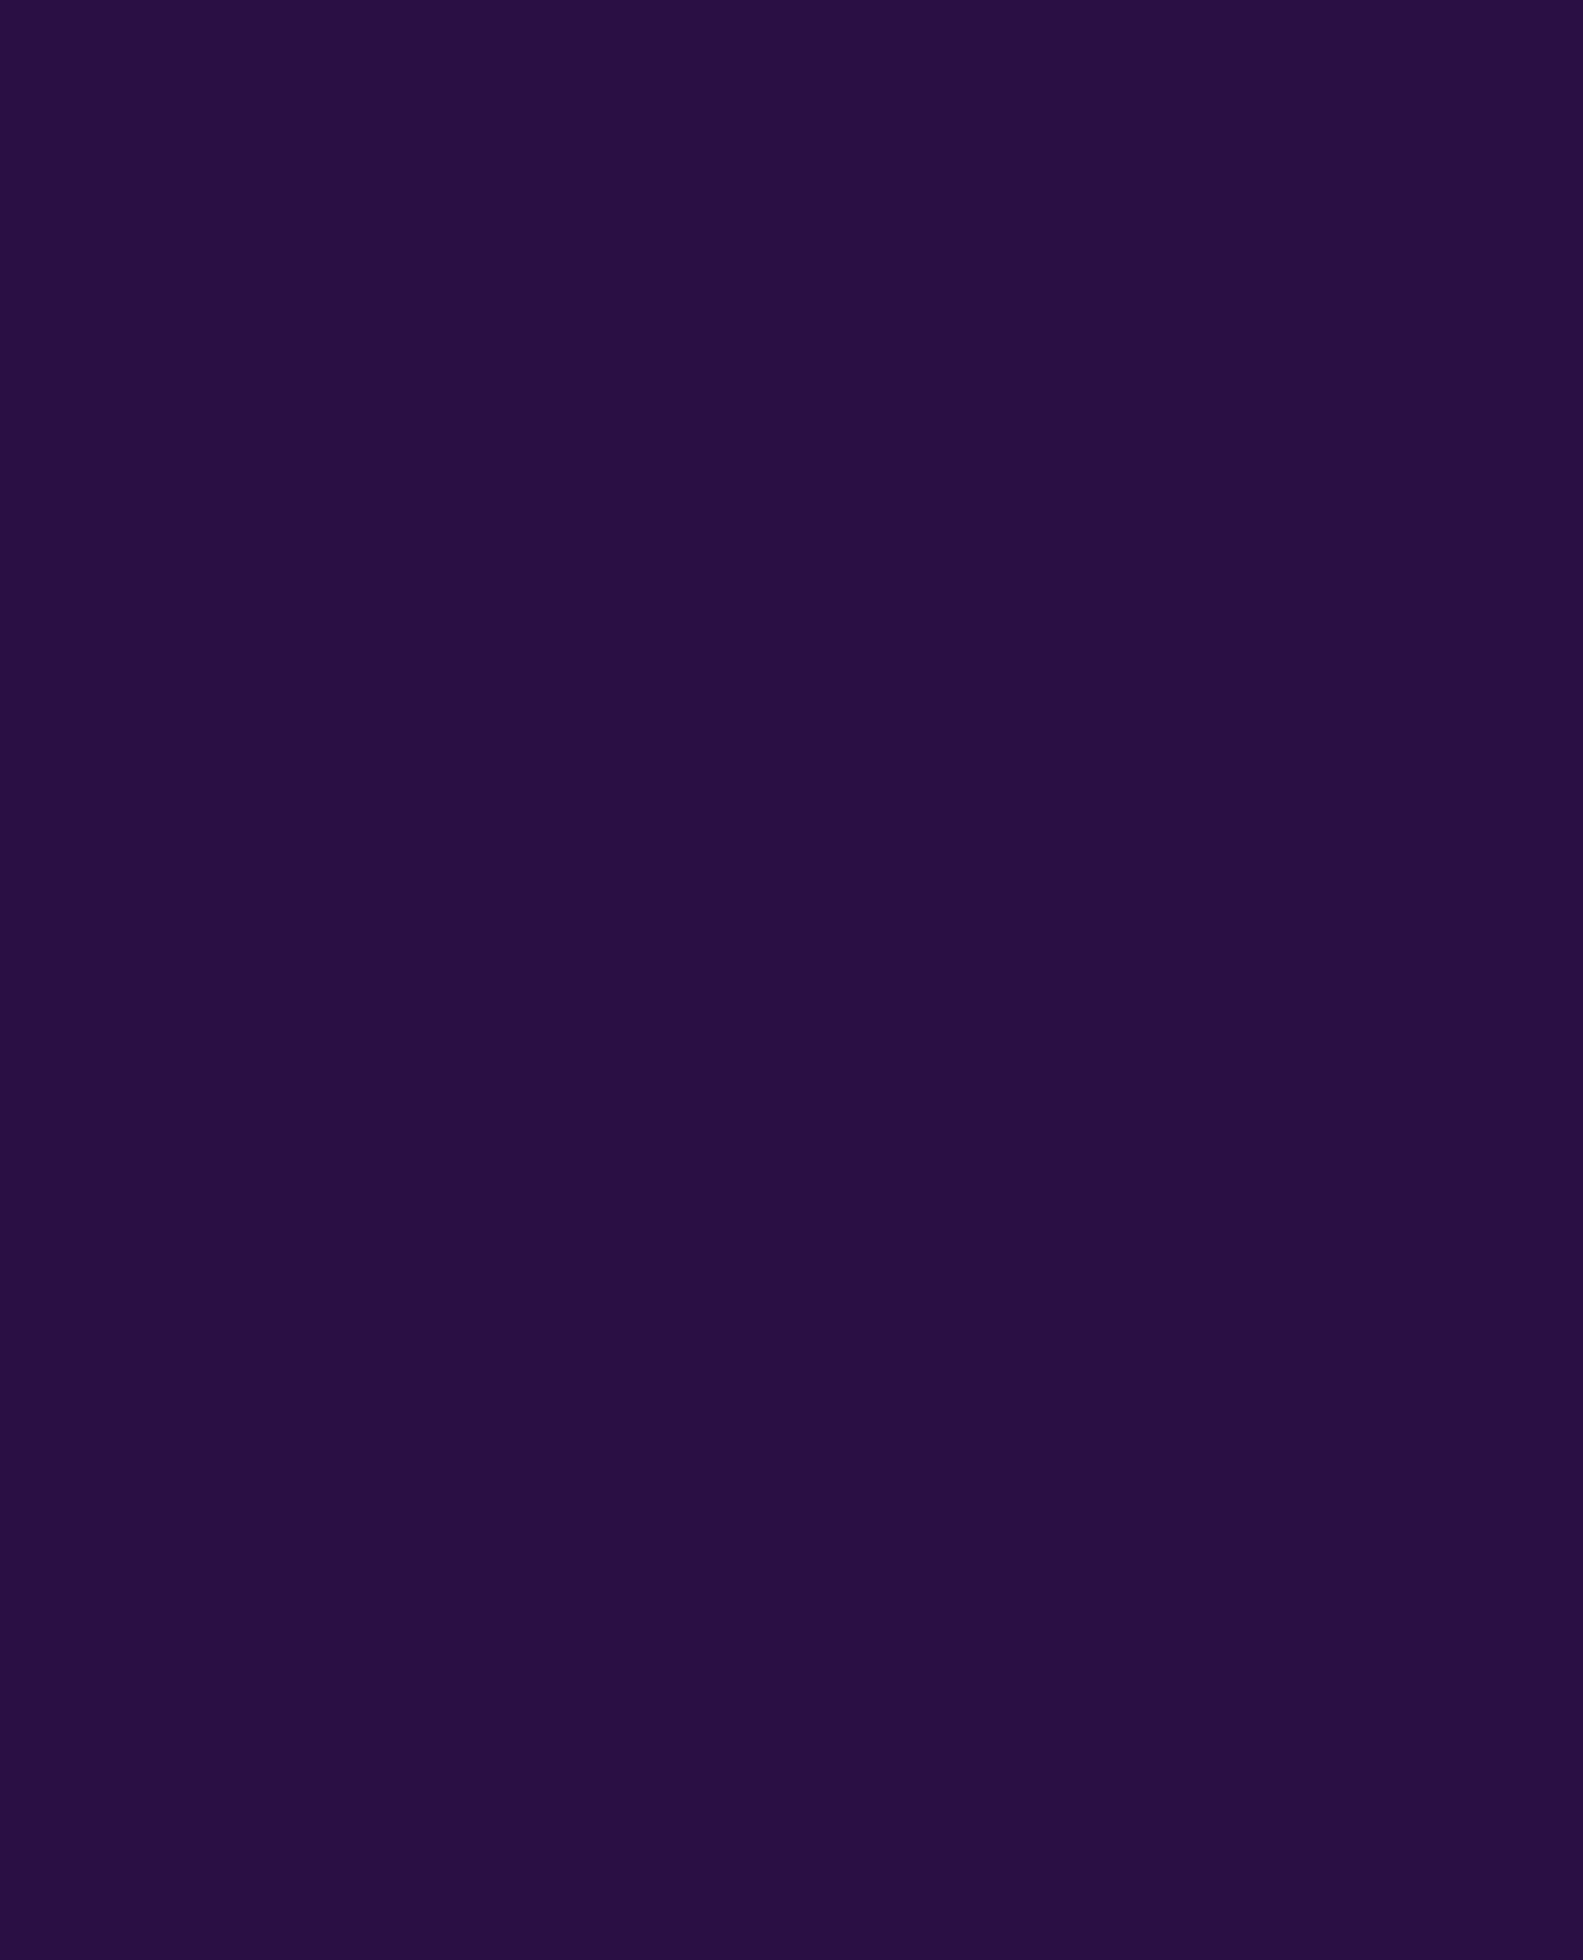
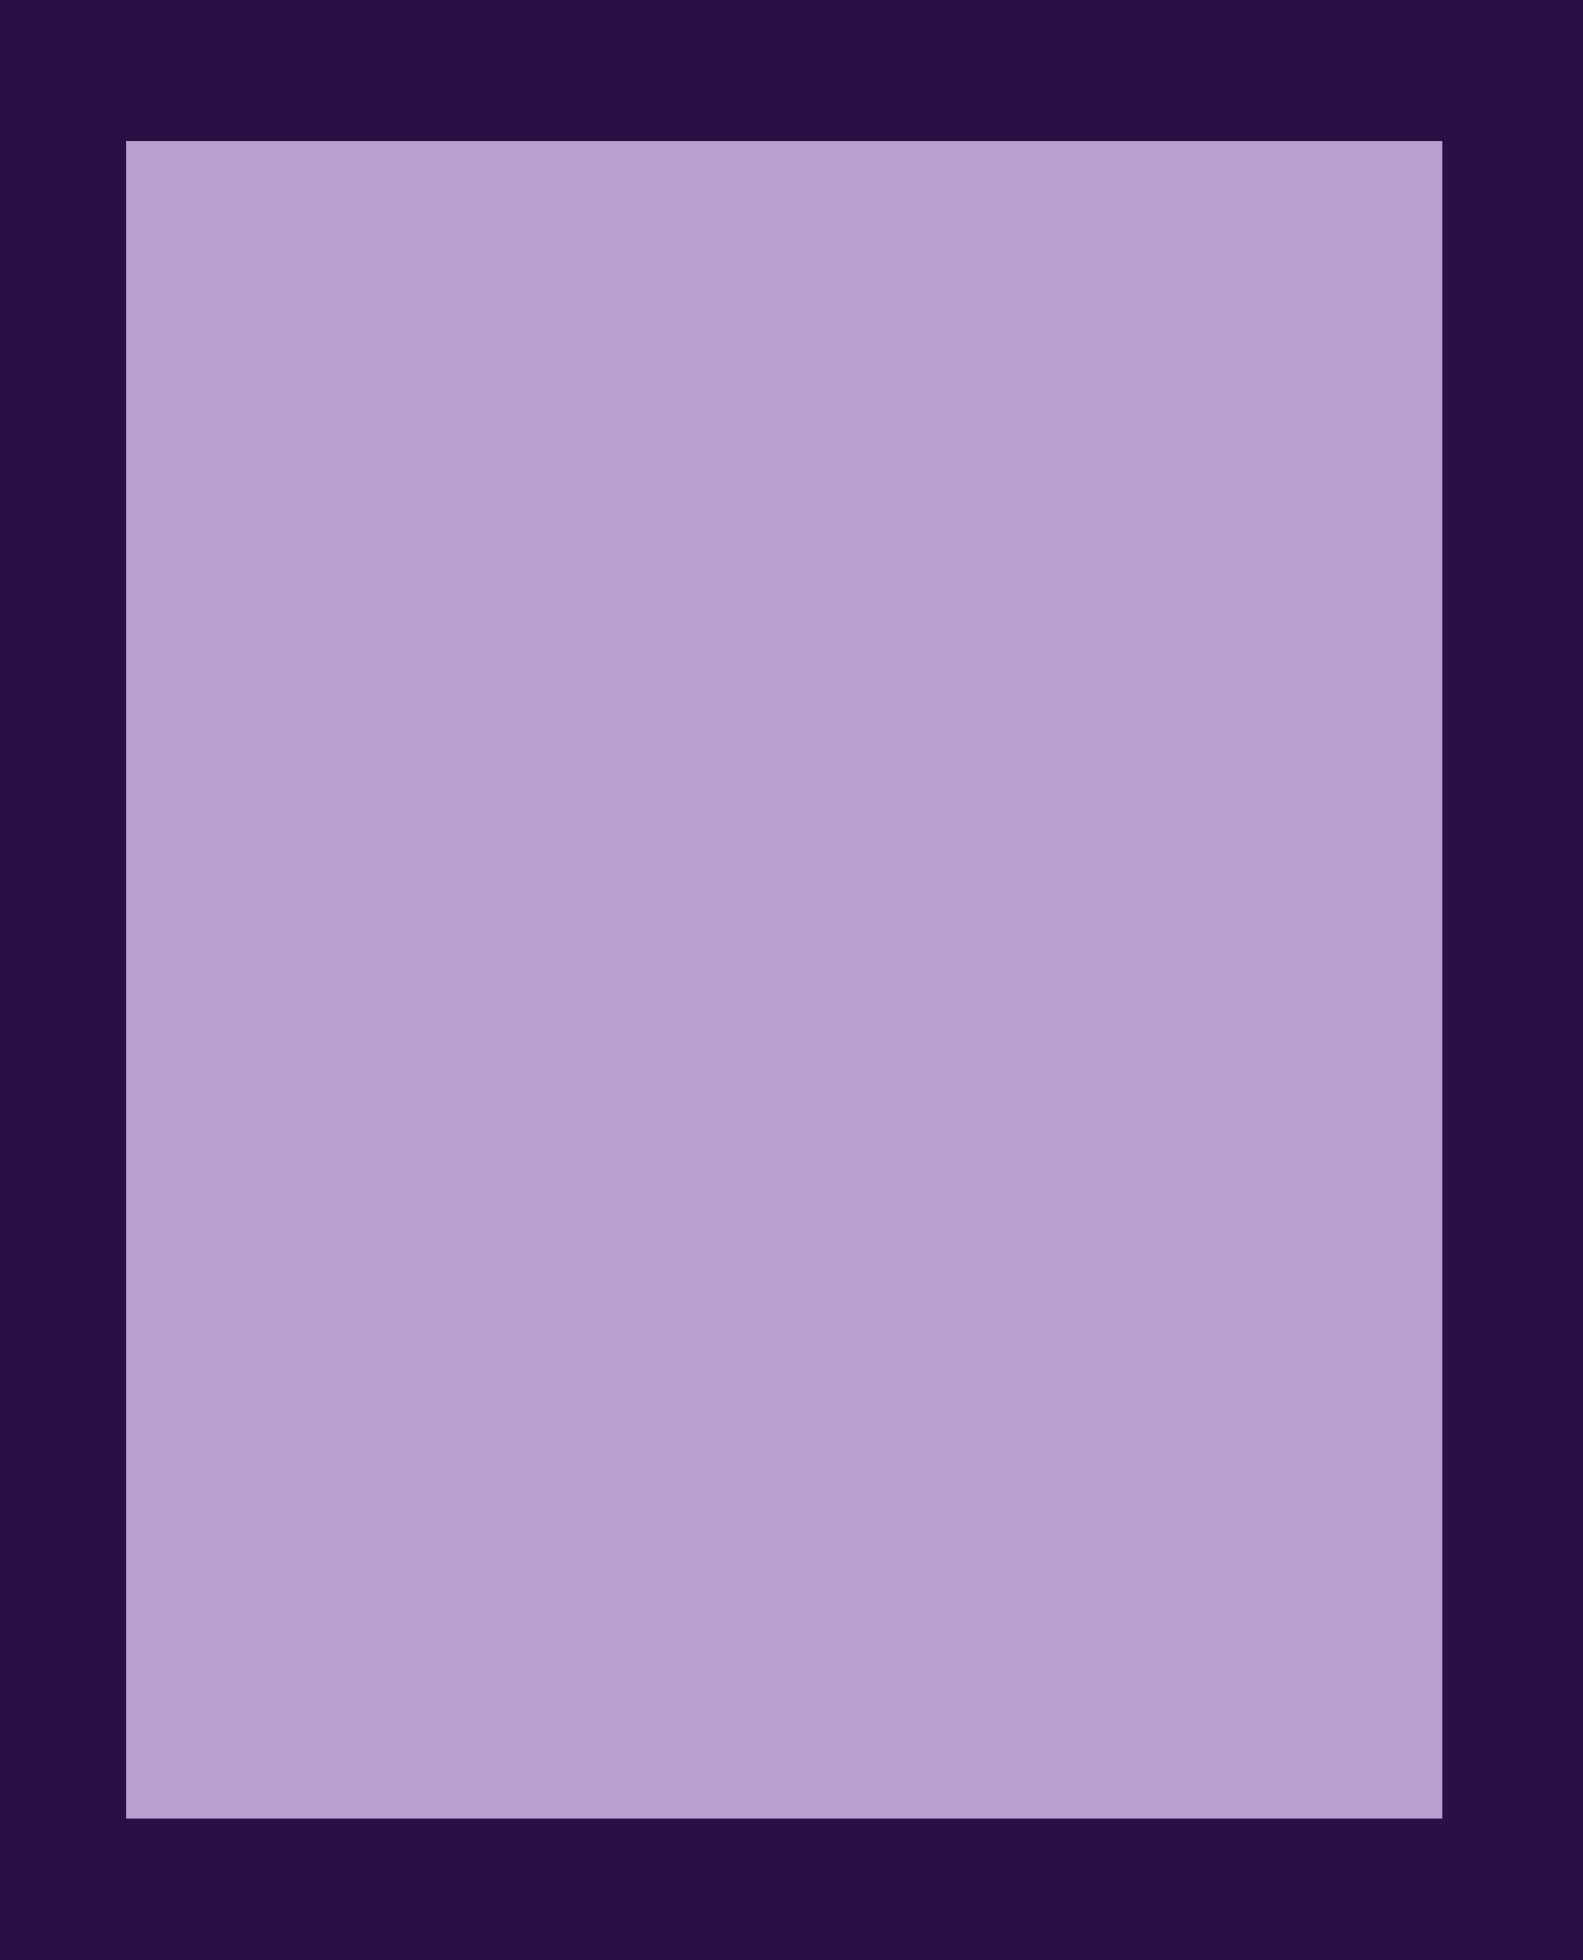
drawing: none -> [126, 141, 1443, 1819]

